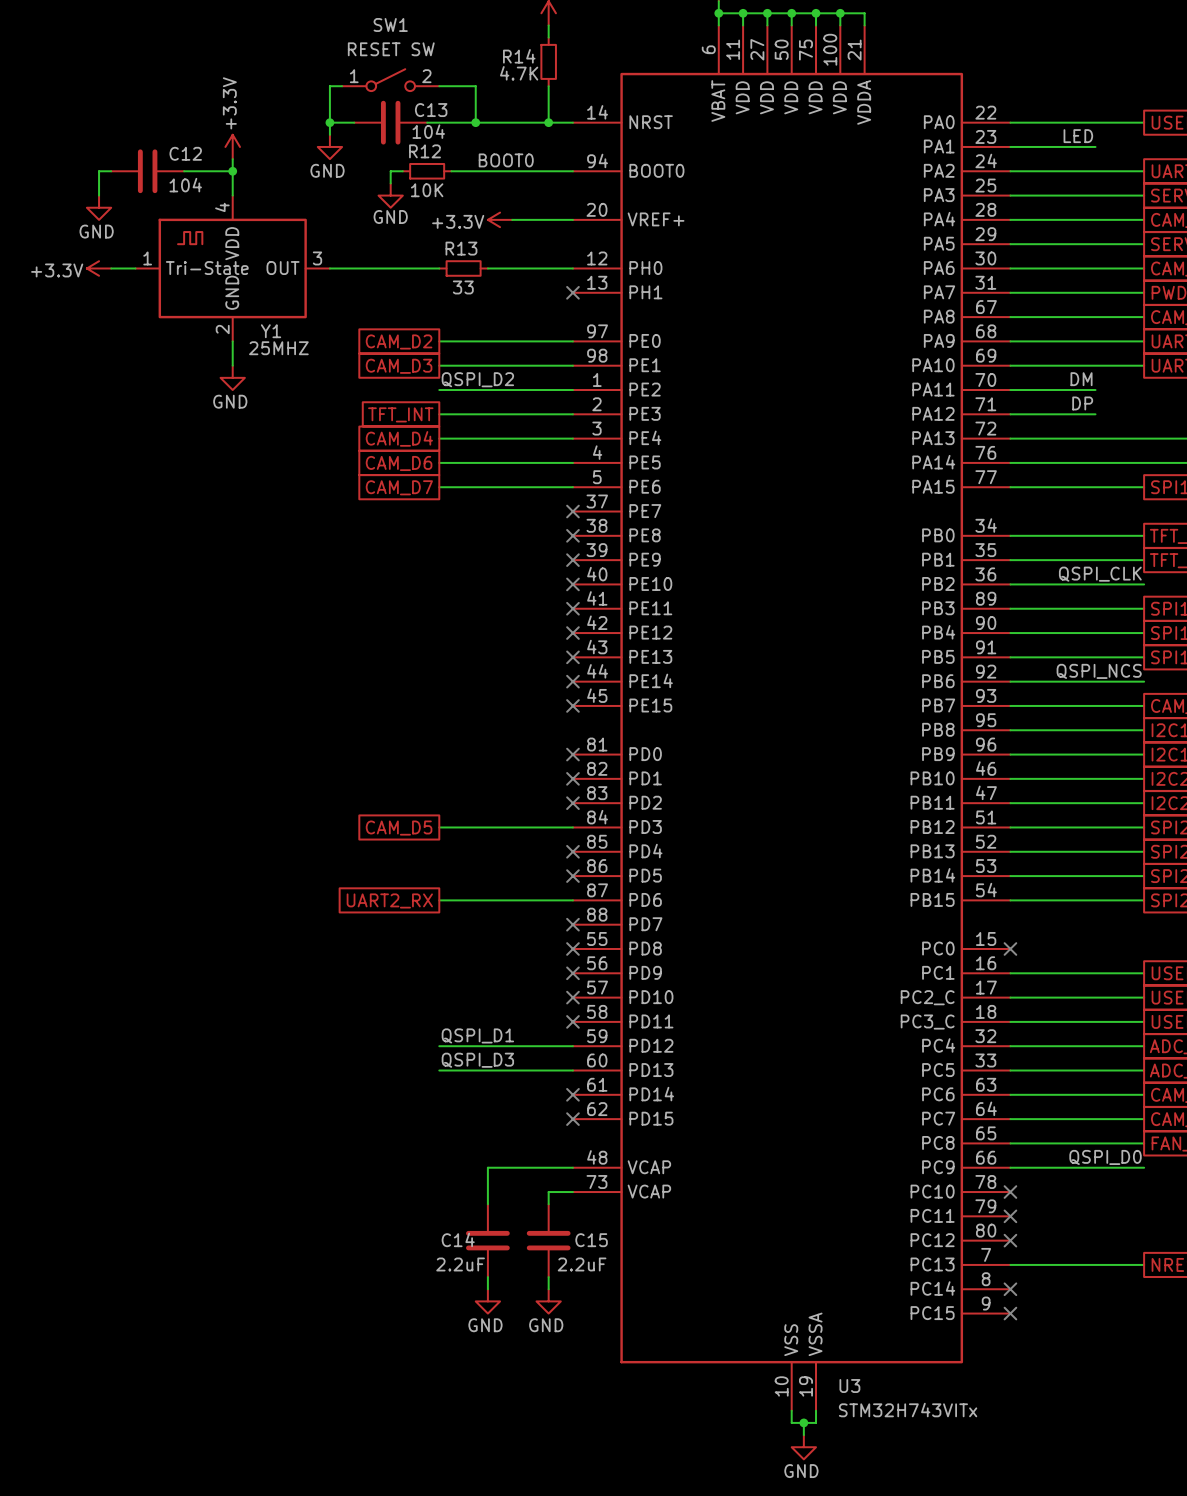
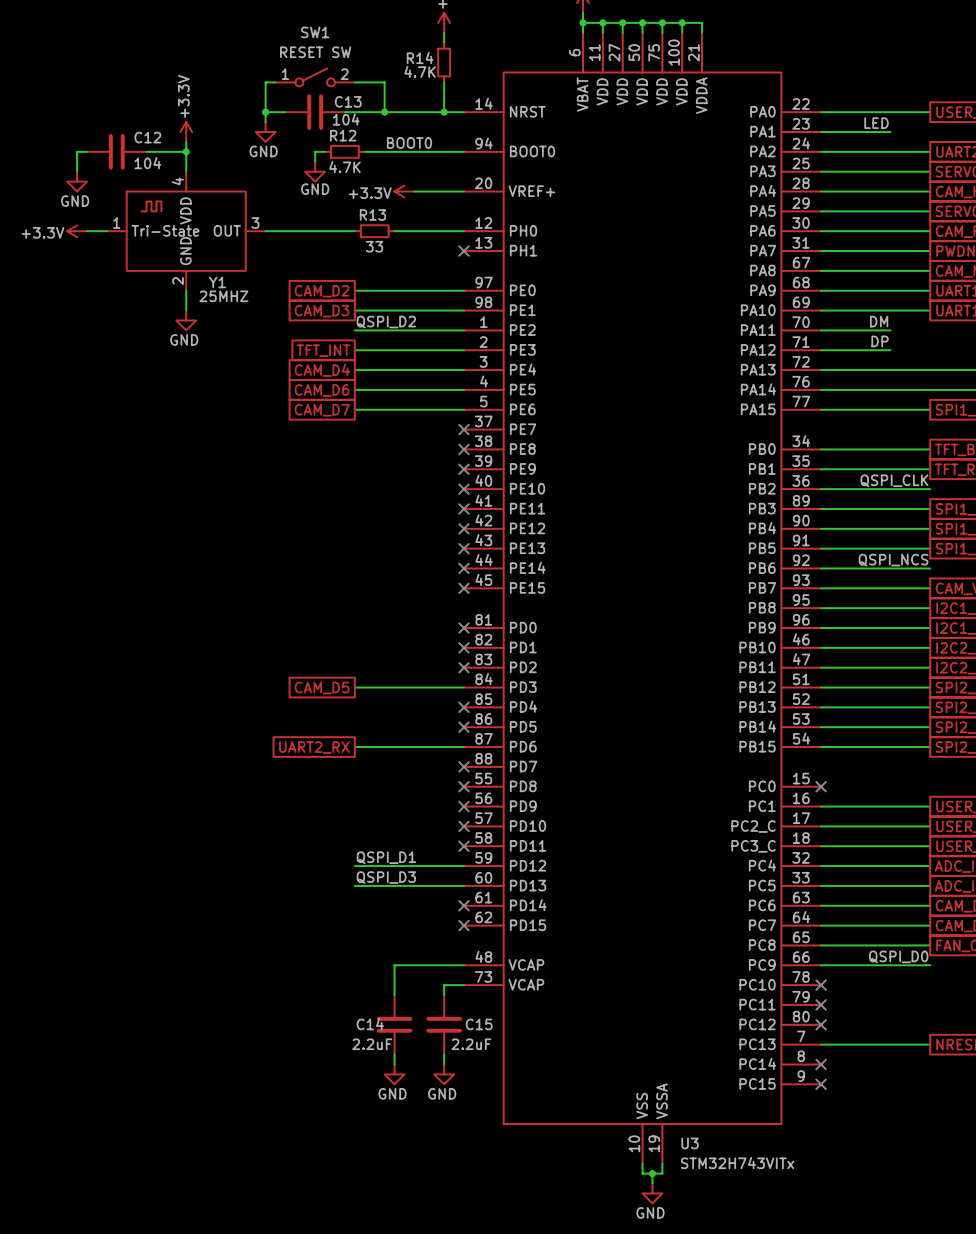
R12 value: 10K (427, 190) -> 4.7K (344, 167)

